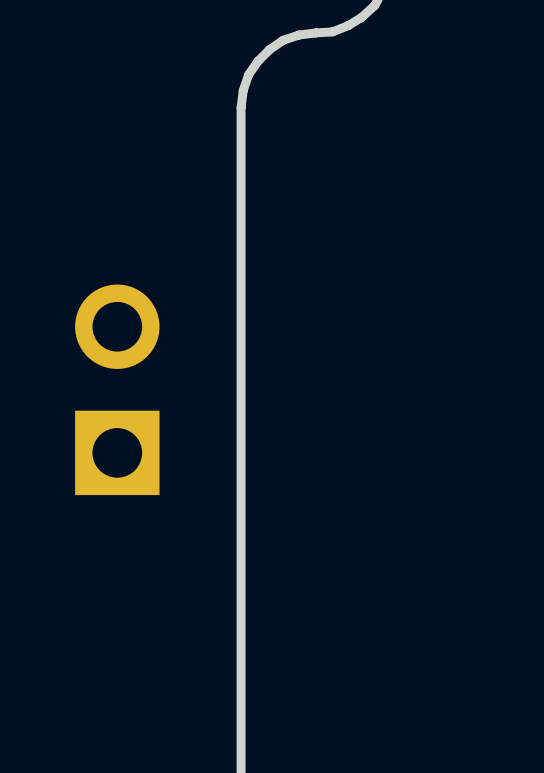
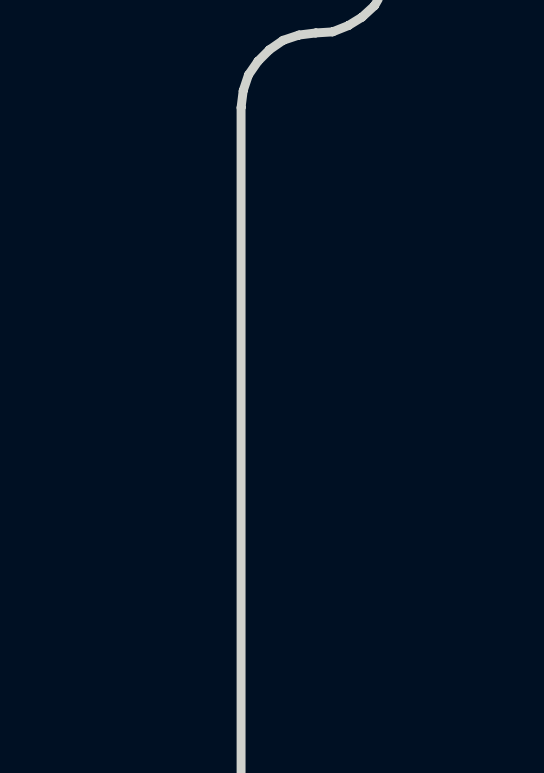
part: (117, 389) -> none

